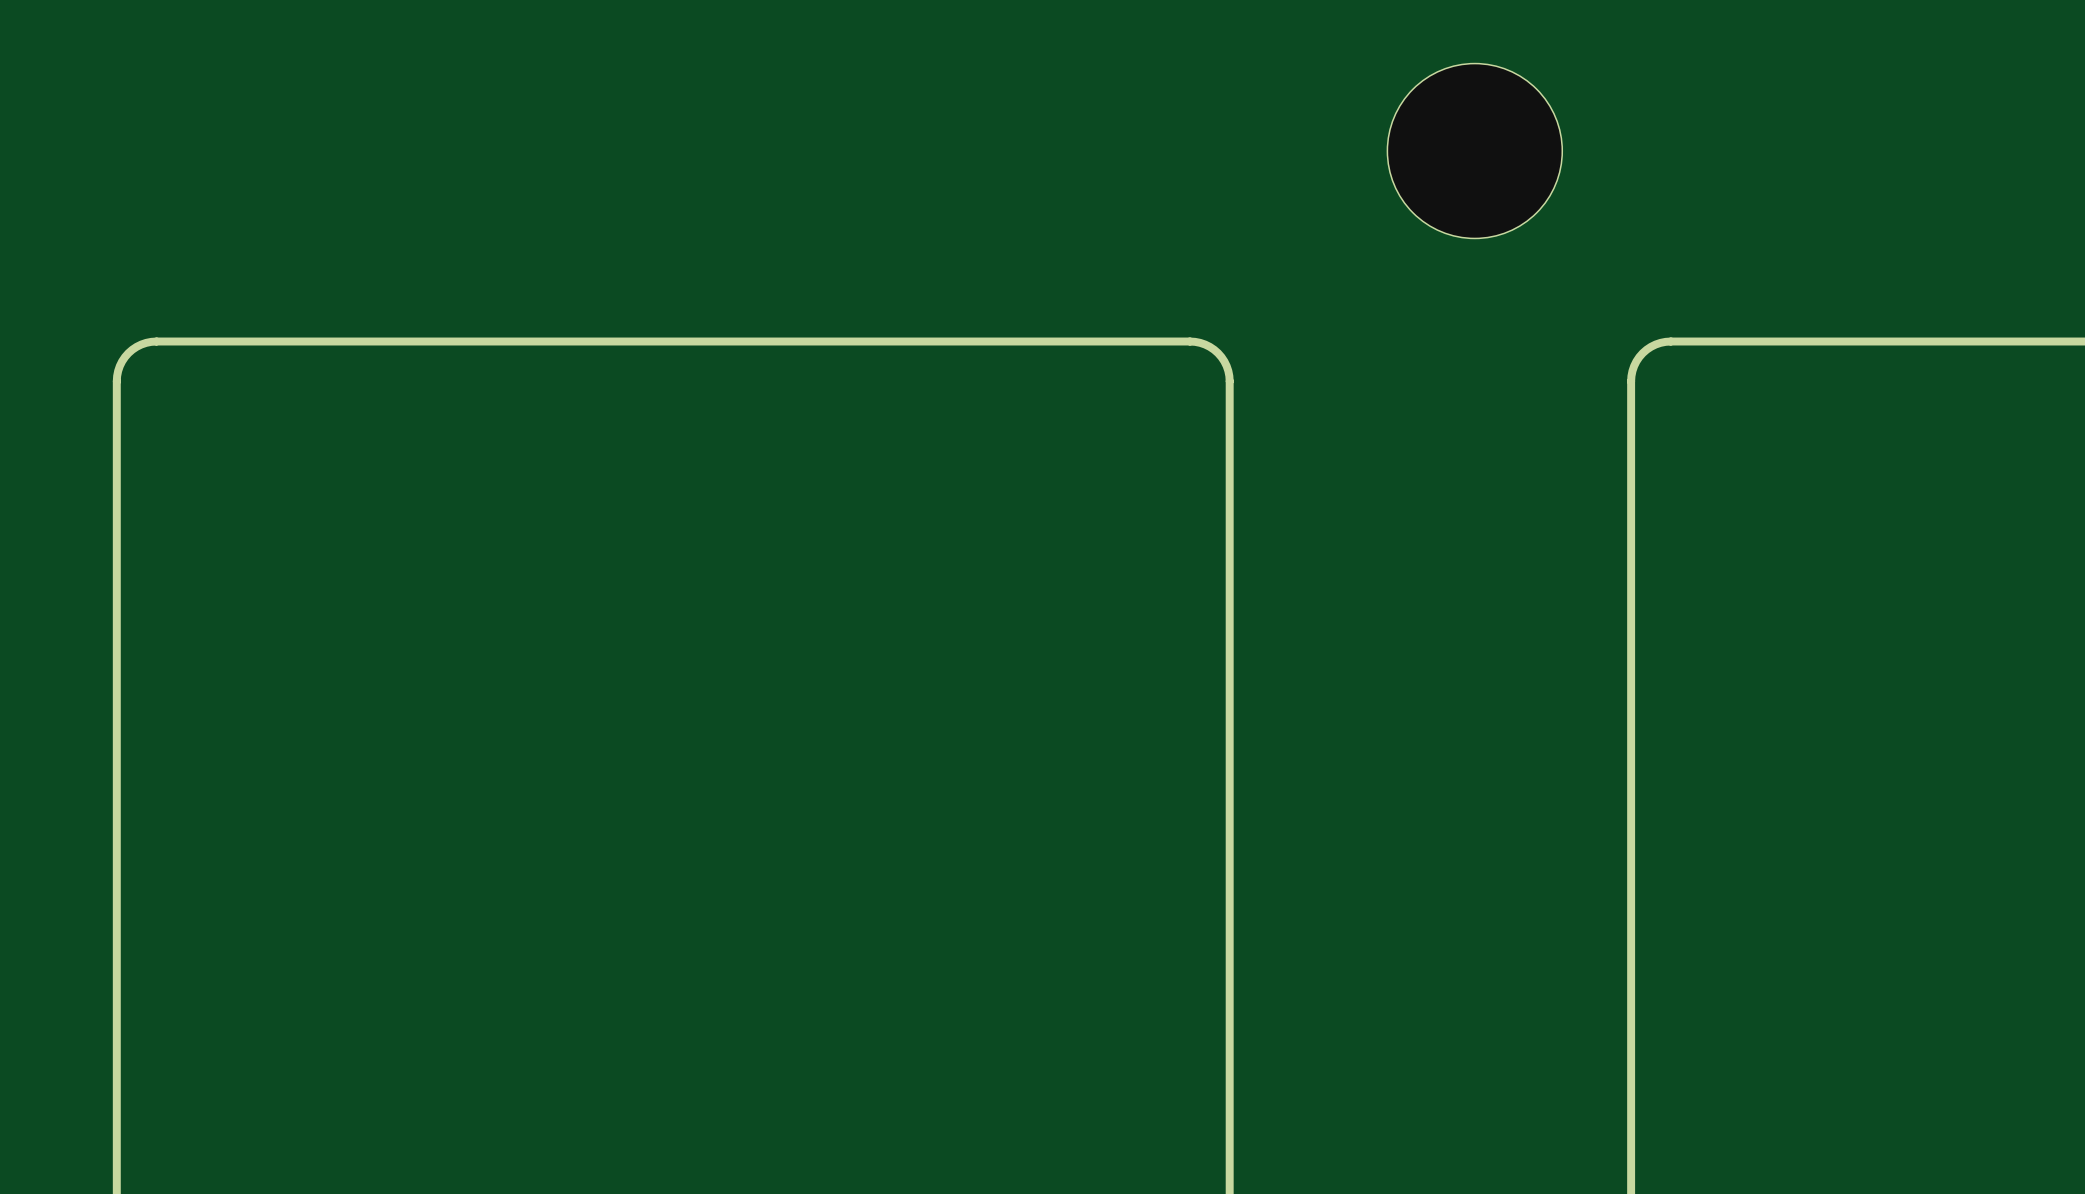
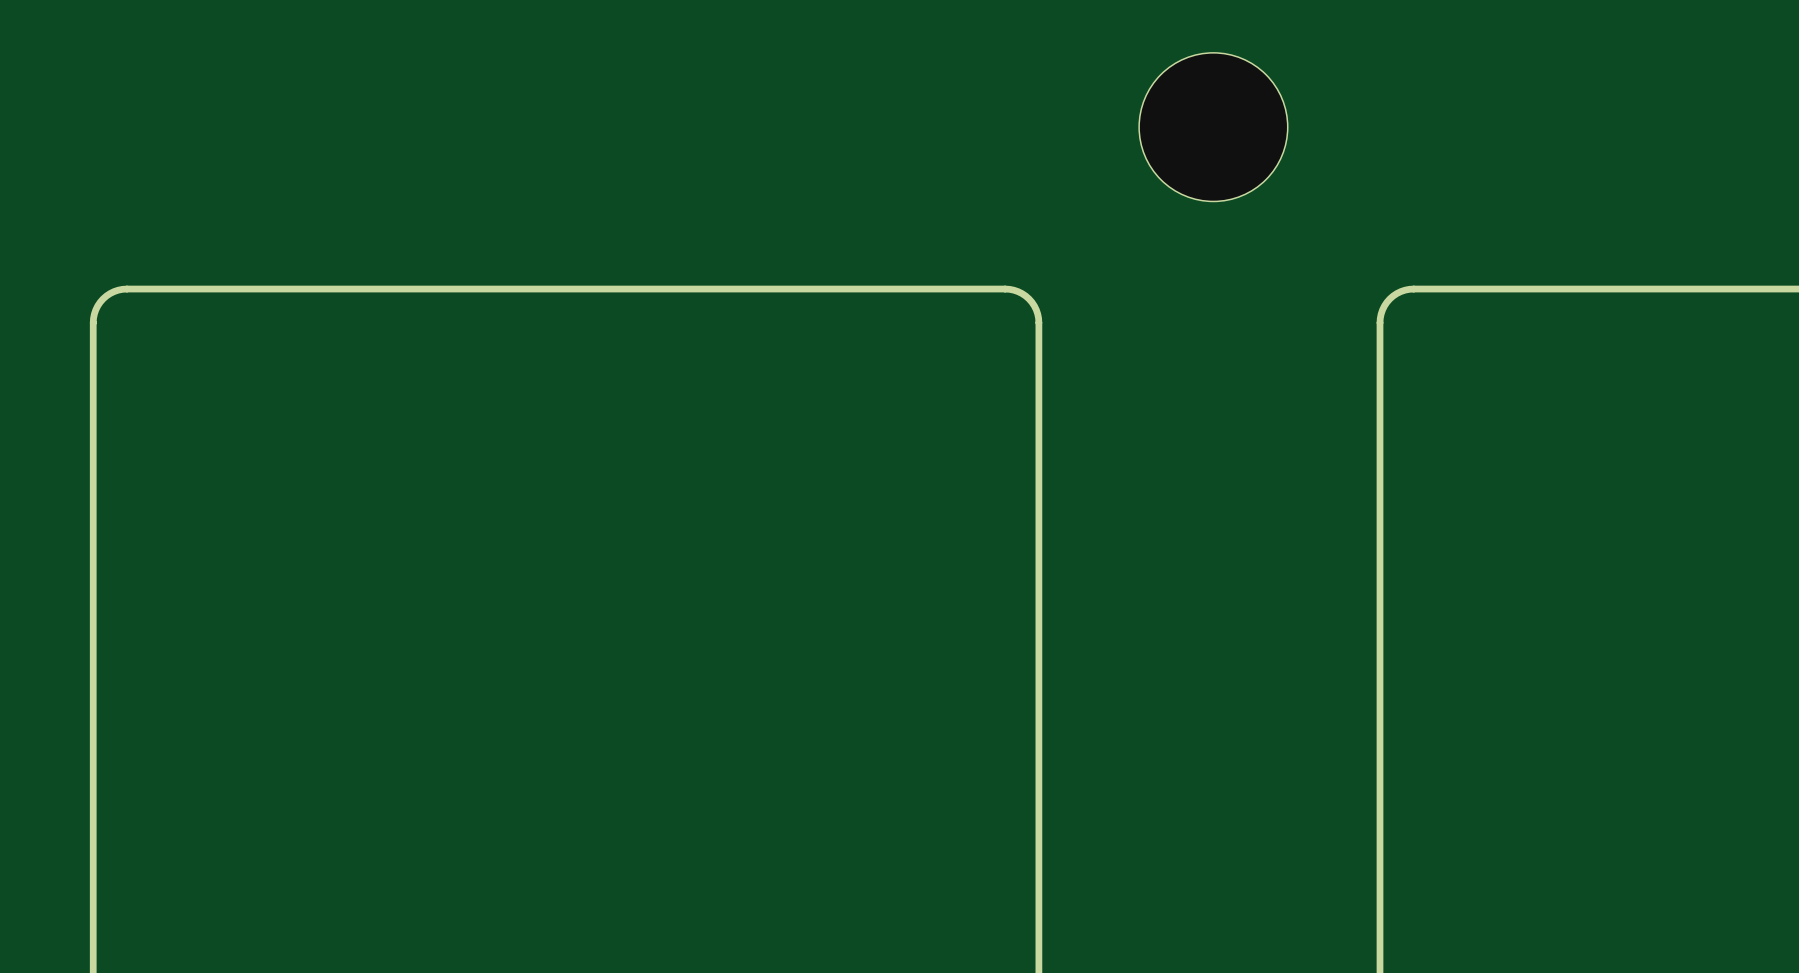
part position: (1474, 151) -> (1213, 127)

